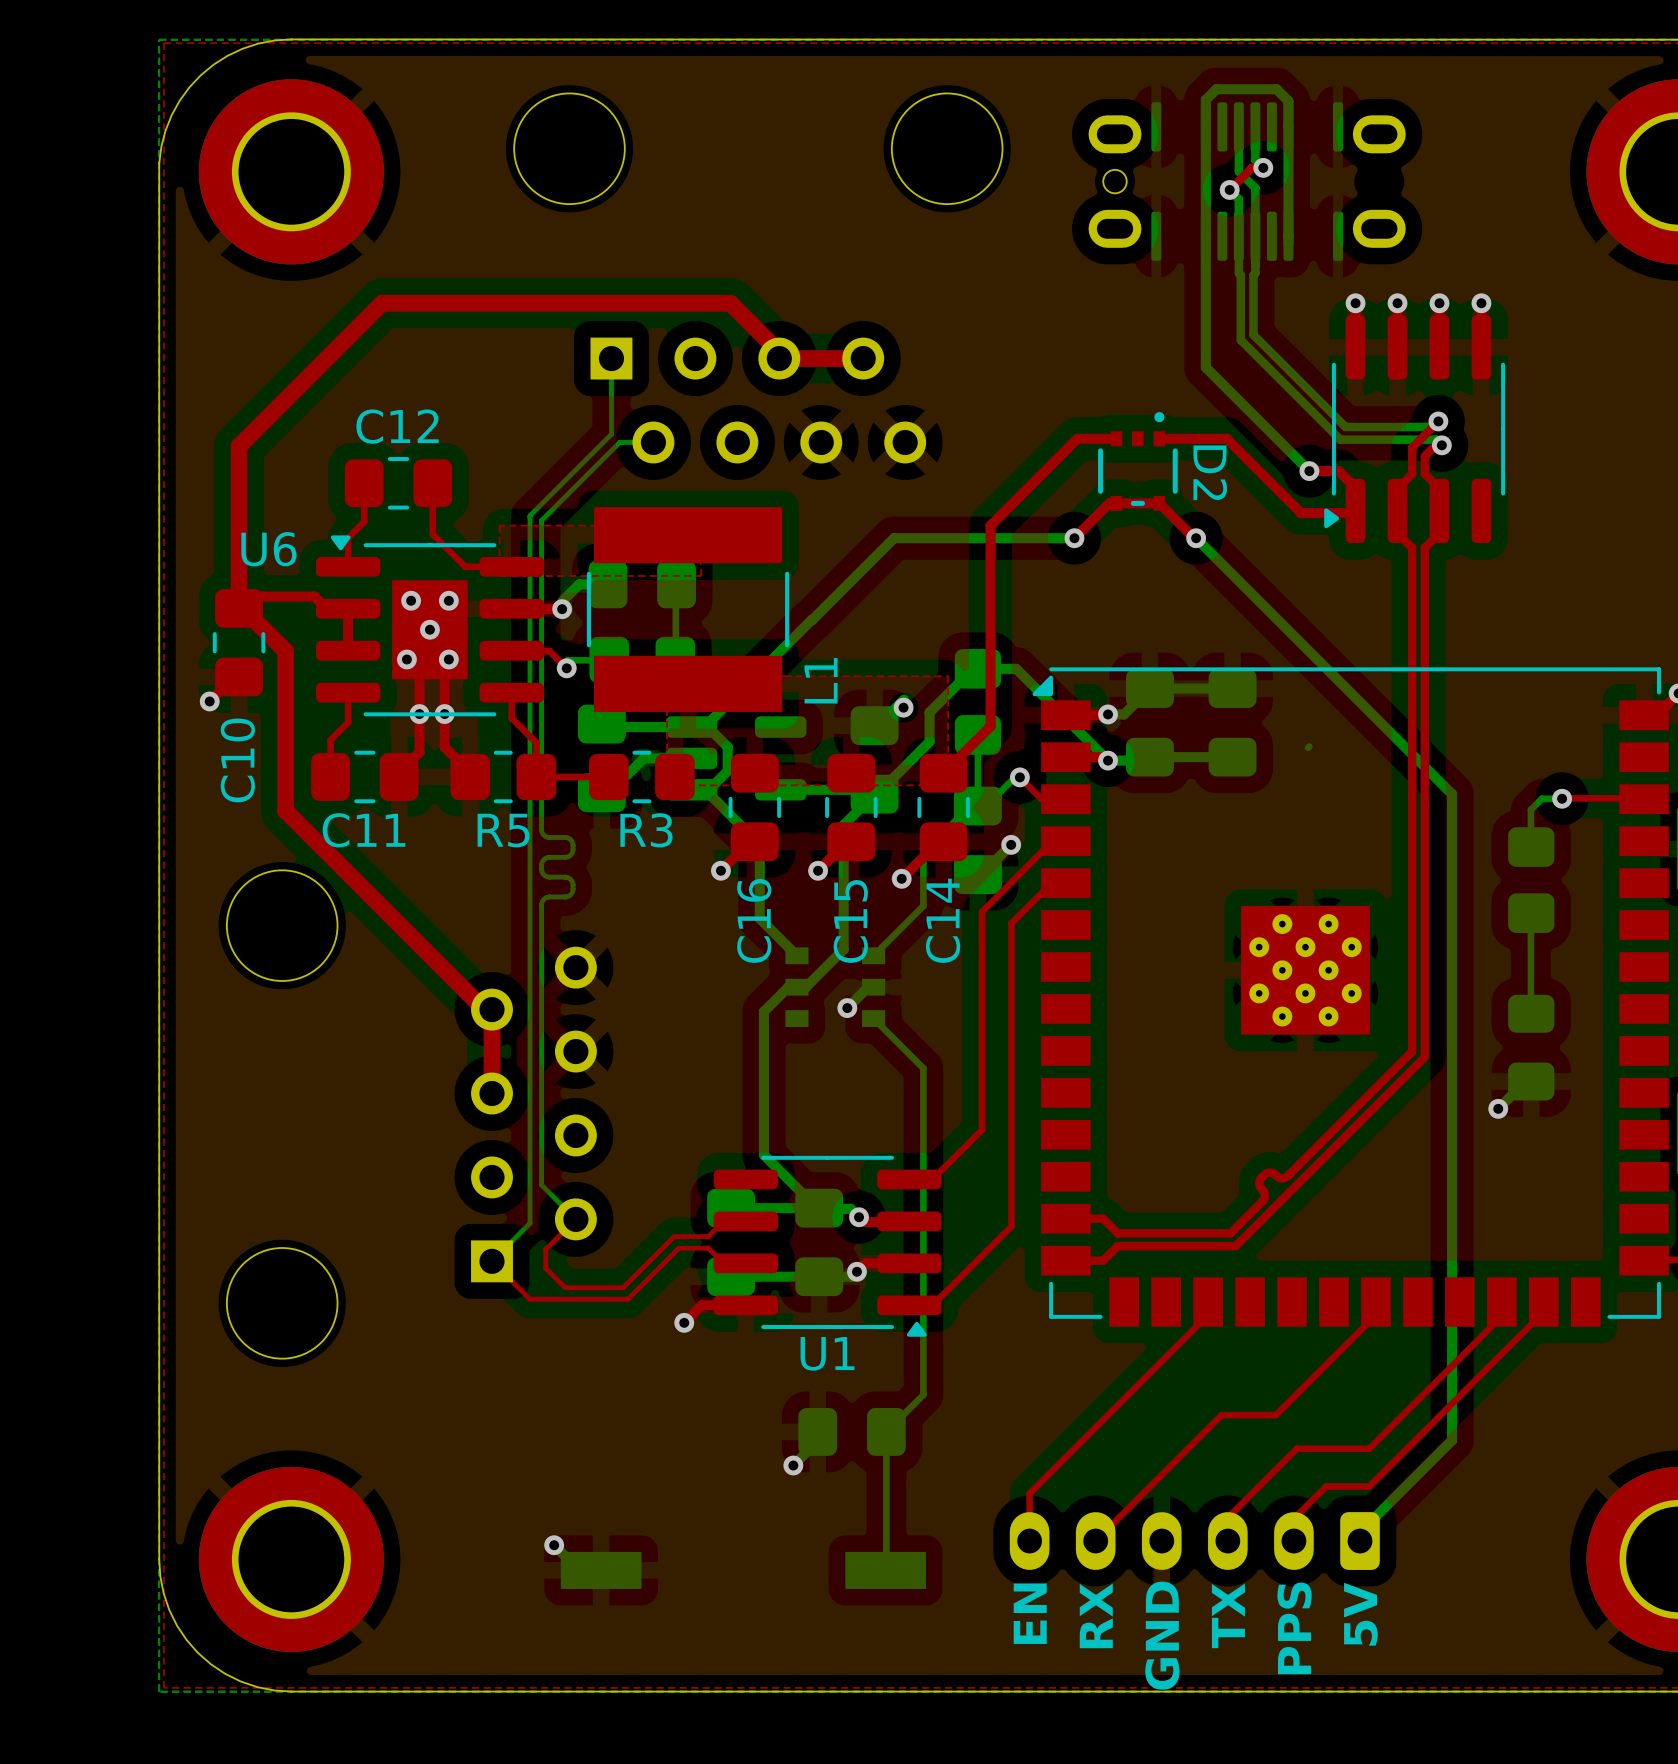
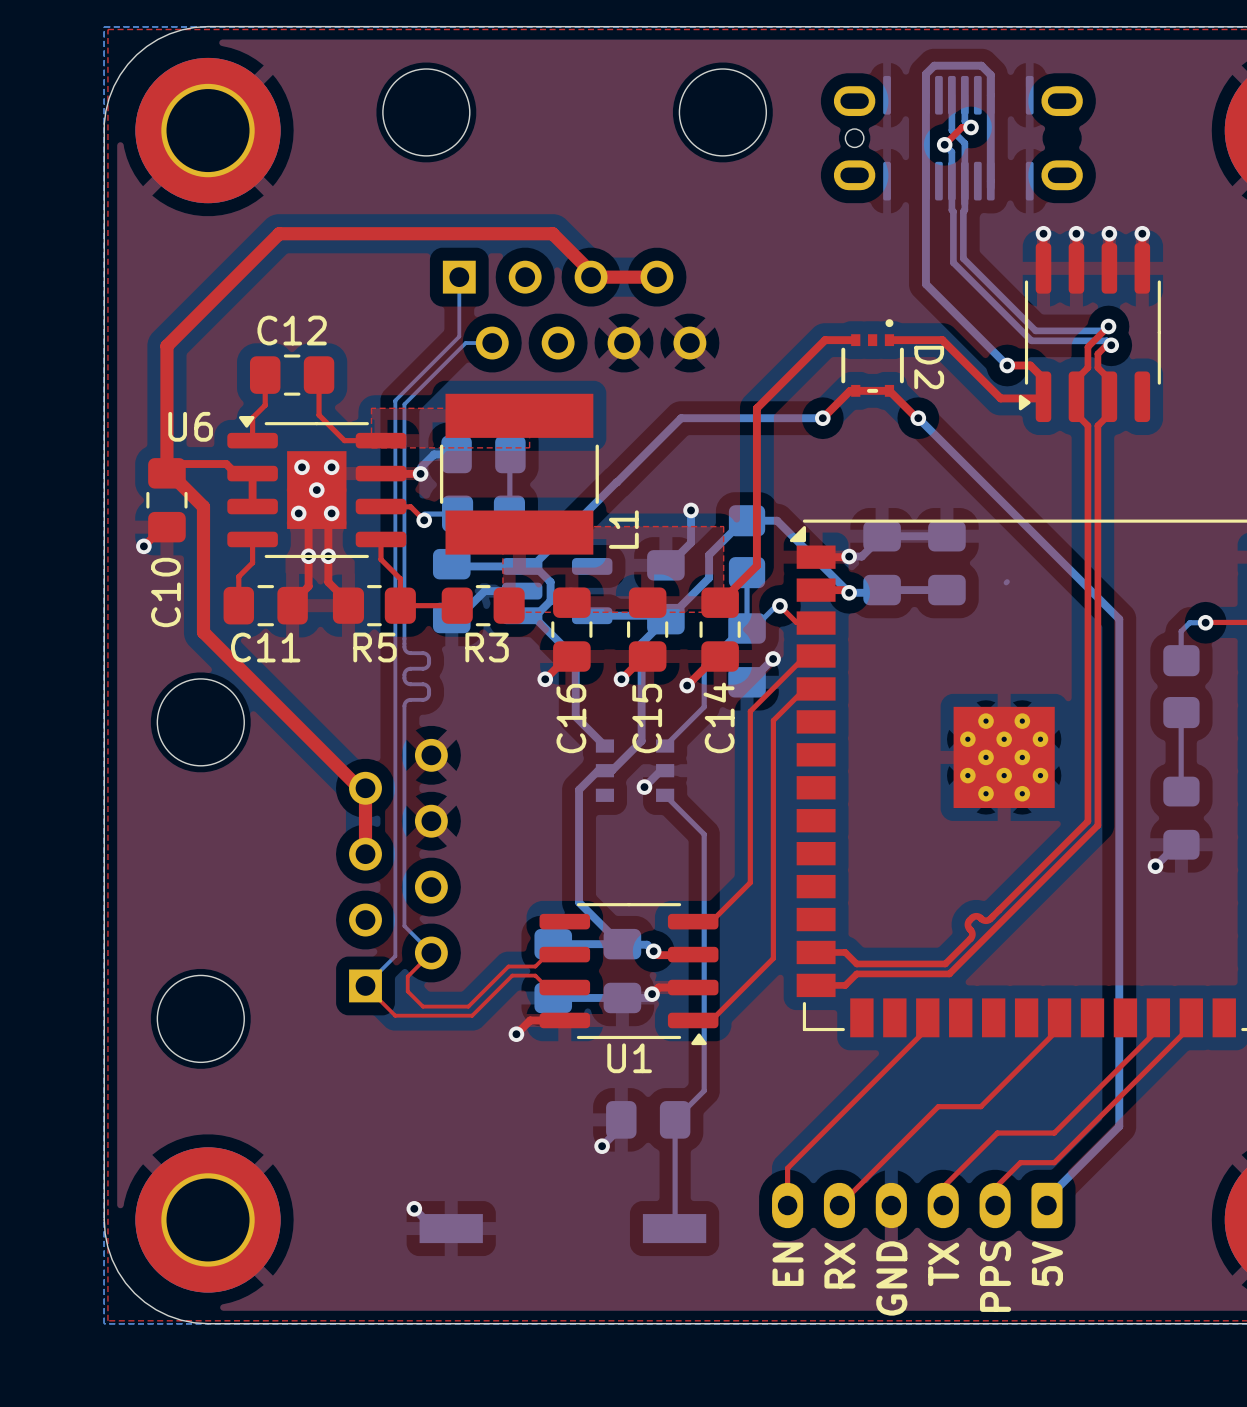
bottom track: none -> (691, 510) (691, 542) (688, 544)
via position: (903, 707) -> (691, 510)

